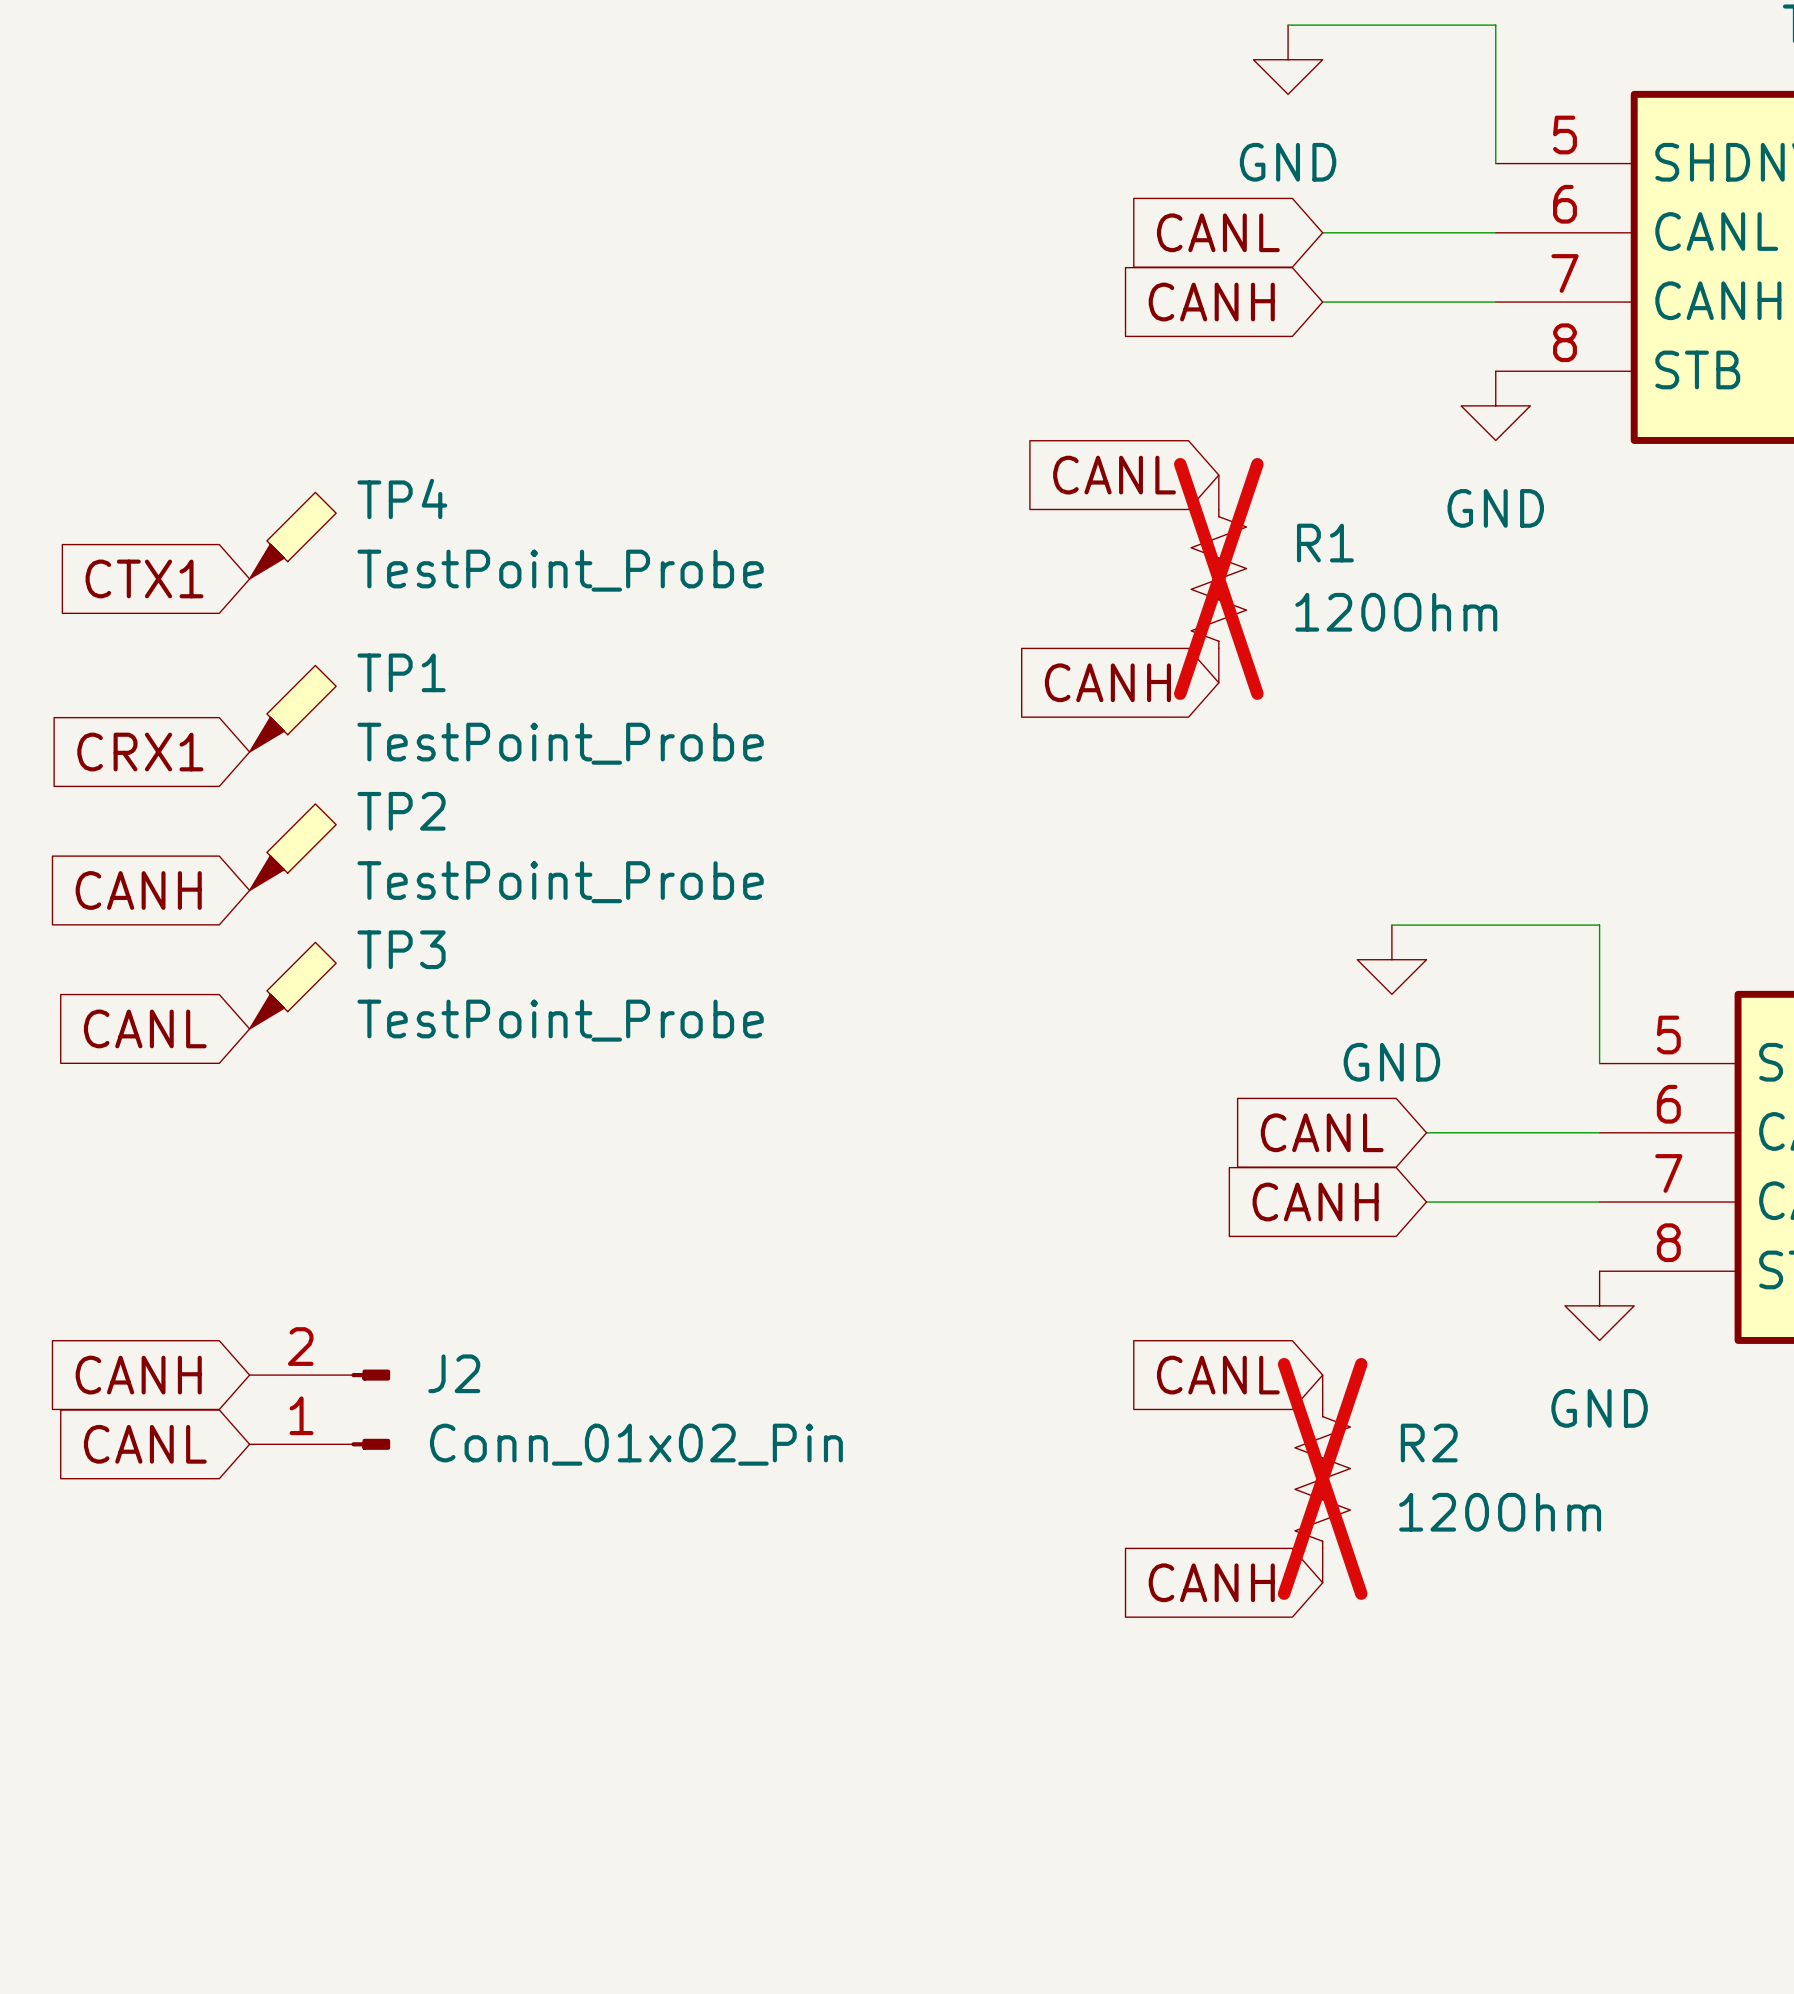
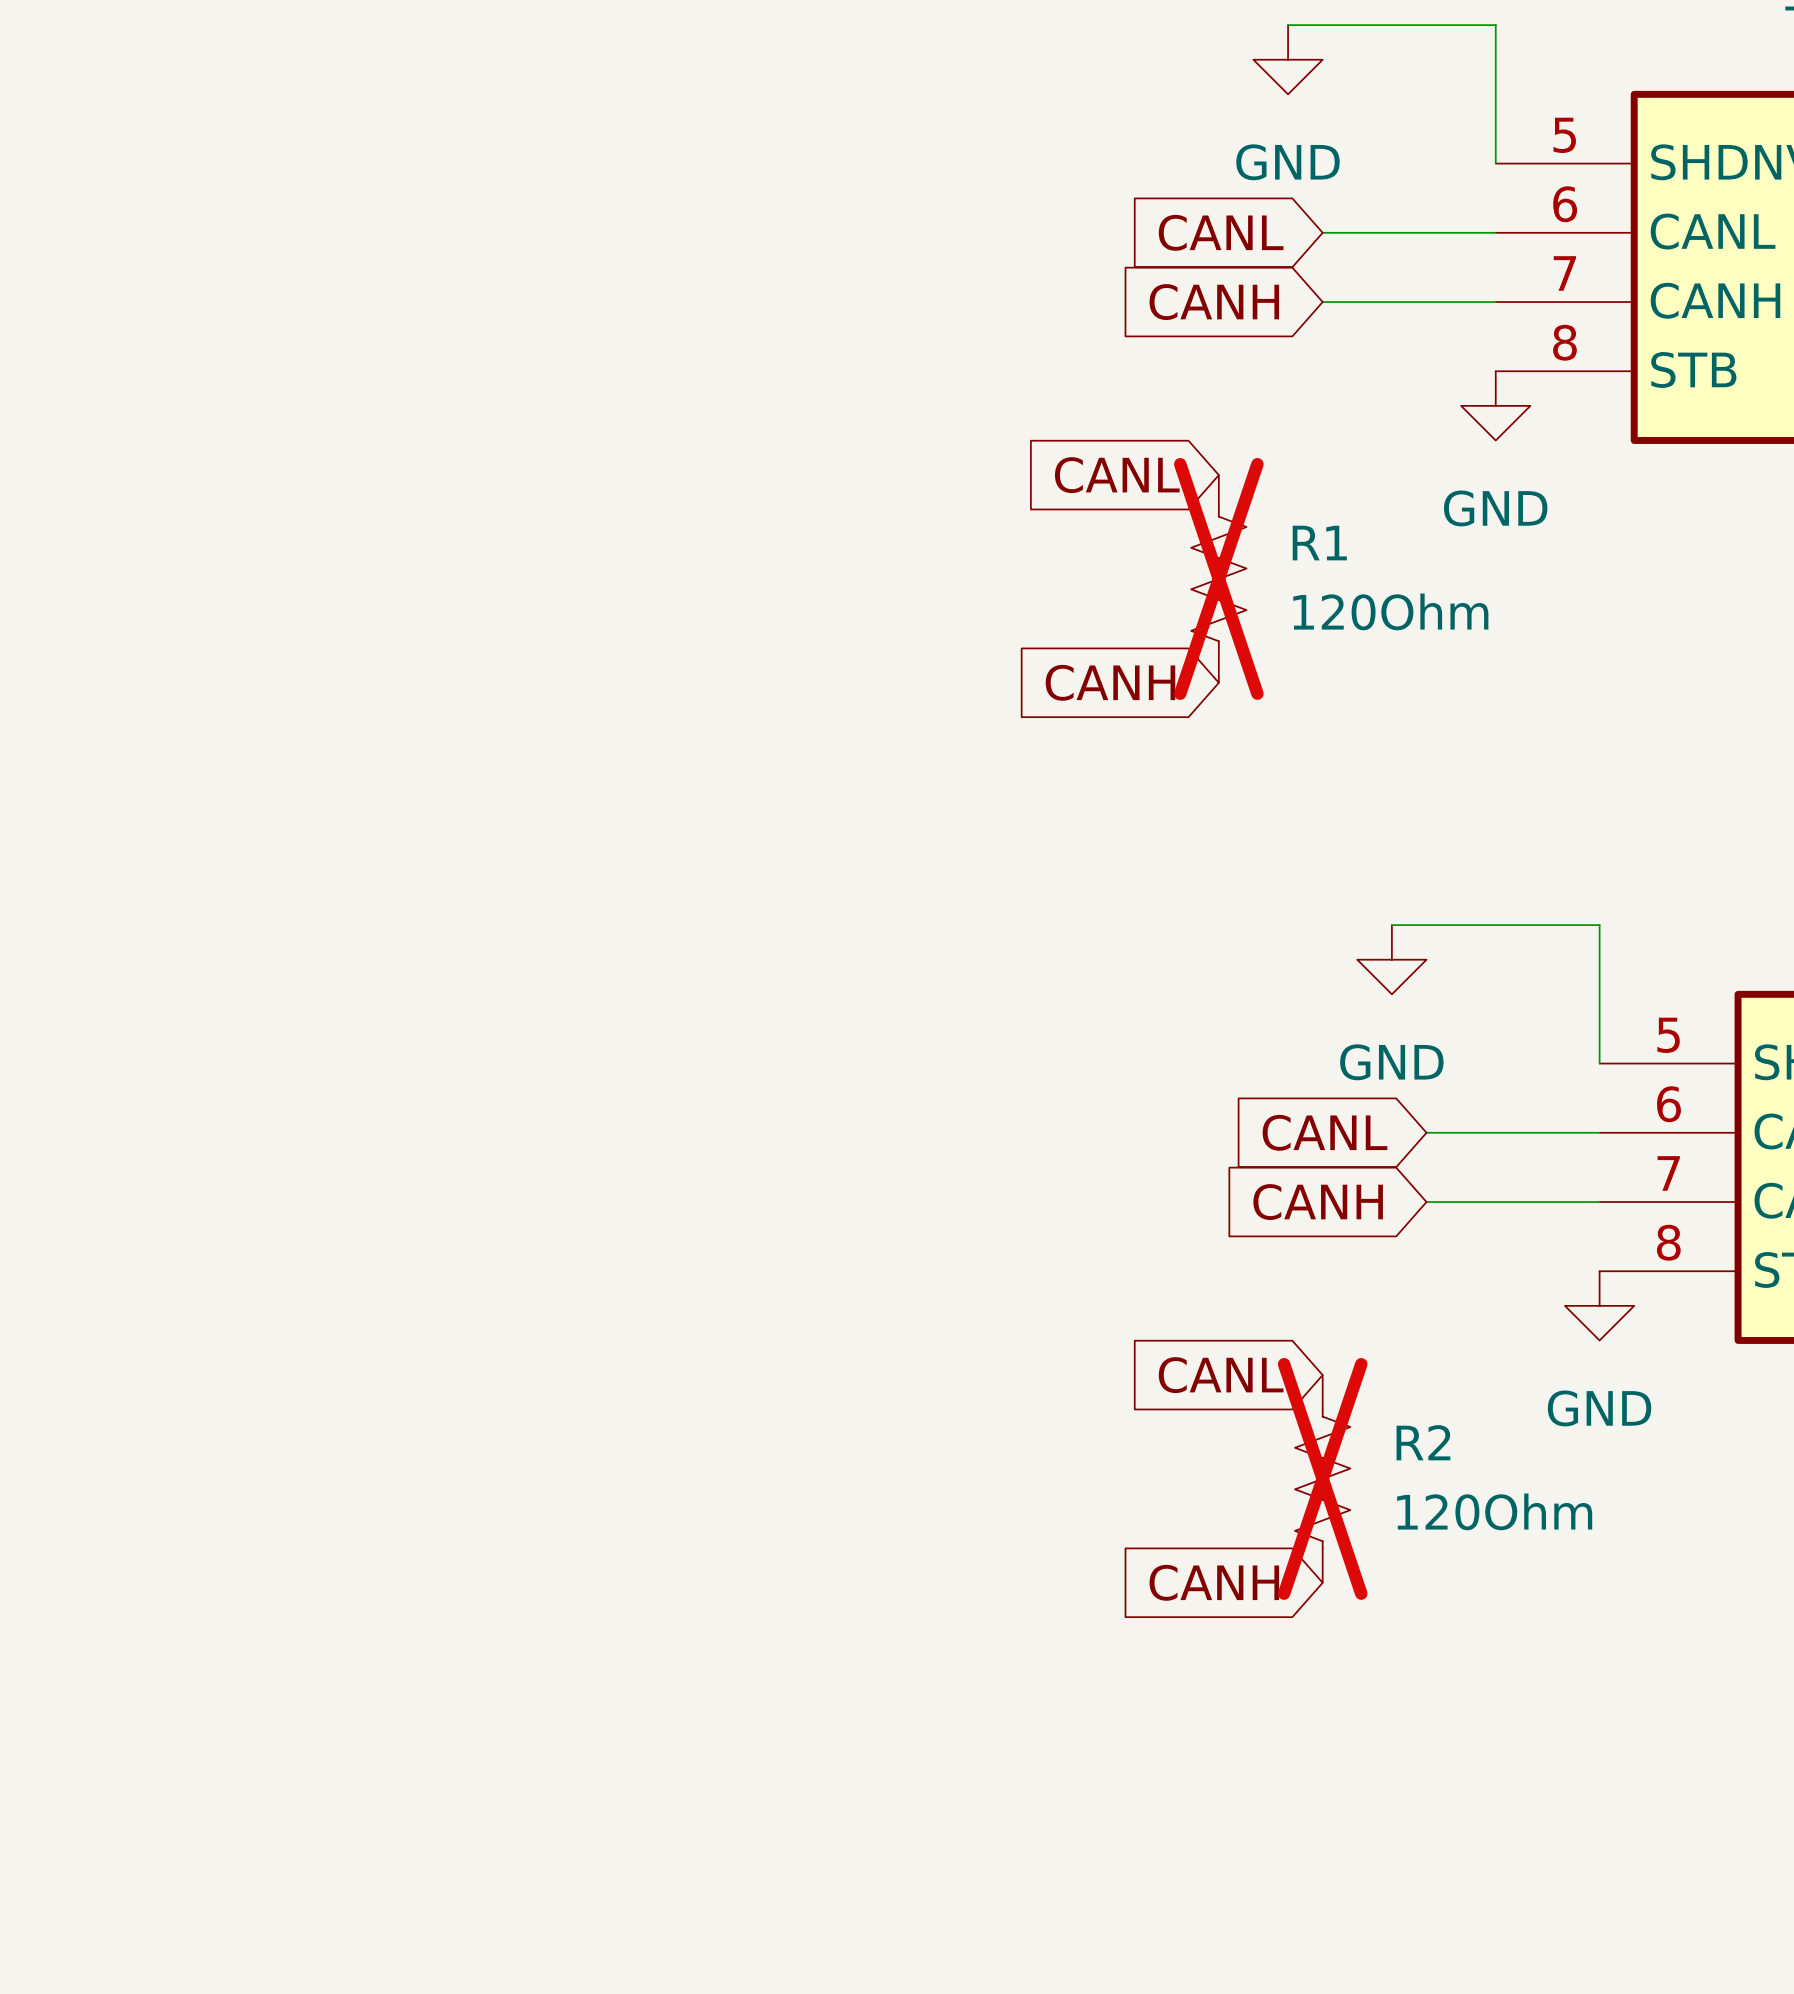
TP4: TestPoint_Probe (292, 535) -> none
global label: CTX1 (144, 578) -> none
TP1: TestPoint_Probe (292, 708) -> none
global label: CRX1 (140, 752) -> none
TP2: TestPoint_Probe (292, 847) -> none
global label: CANH (138, 890) -> none
TP3: TestPoint_Probe (292, 985) -> none
global label: CANL (145, 1028) -> none
global label: CANH (138, 1375) -> none
J2: Conn_01x02_Pin (319, 1409) -> none
global label: CANL (145, 1444) -> none

